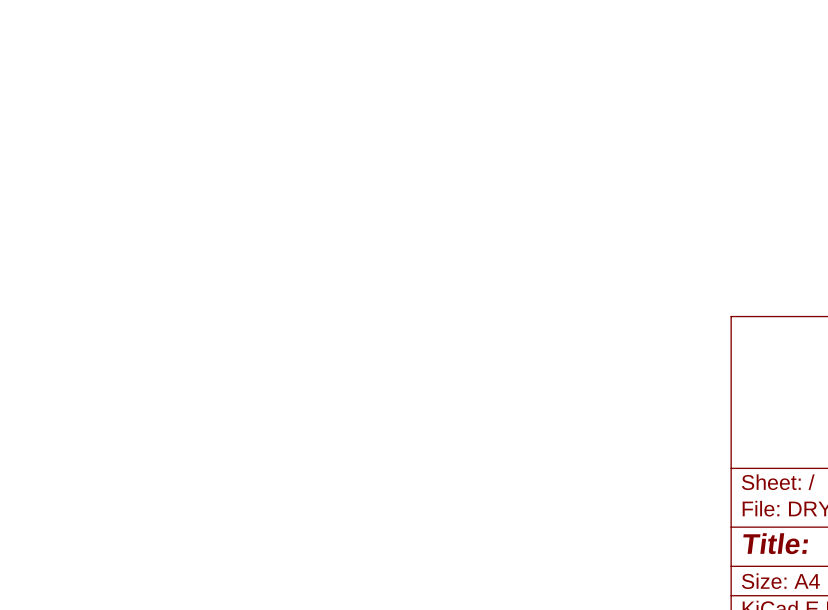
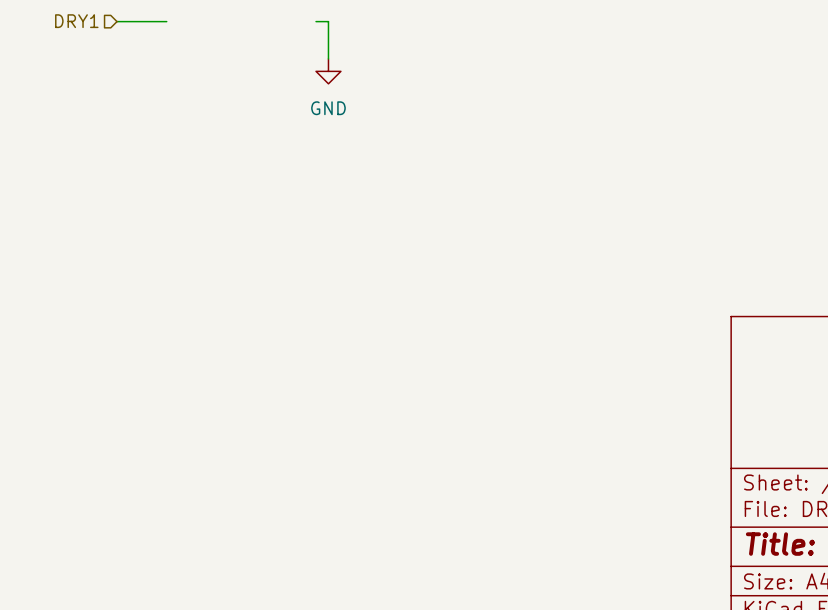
hierarchical label: none -> DRY1 (76, 21)
wire: none -> (116, 21) (166, 21)
wire: none -> (316, 21) (328, 21) (328, 58)
power symbol: none -> GND (328, 71)

